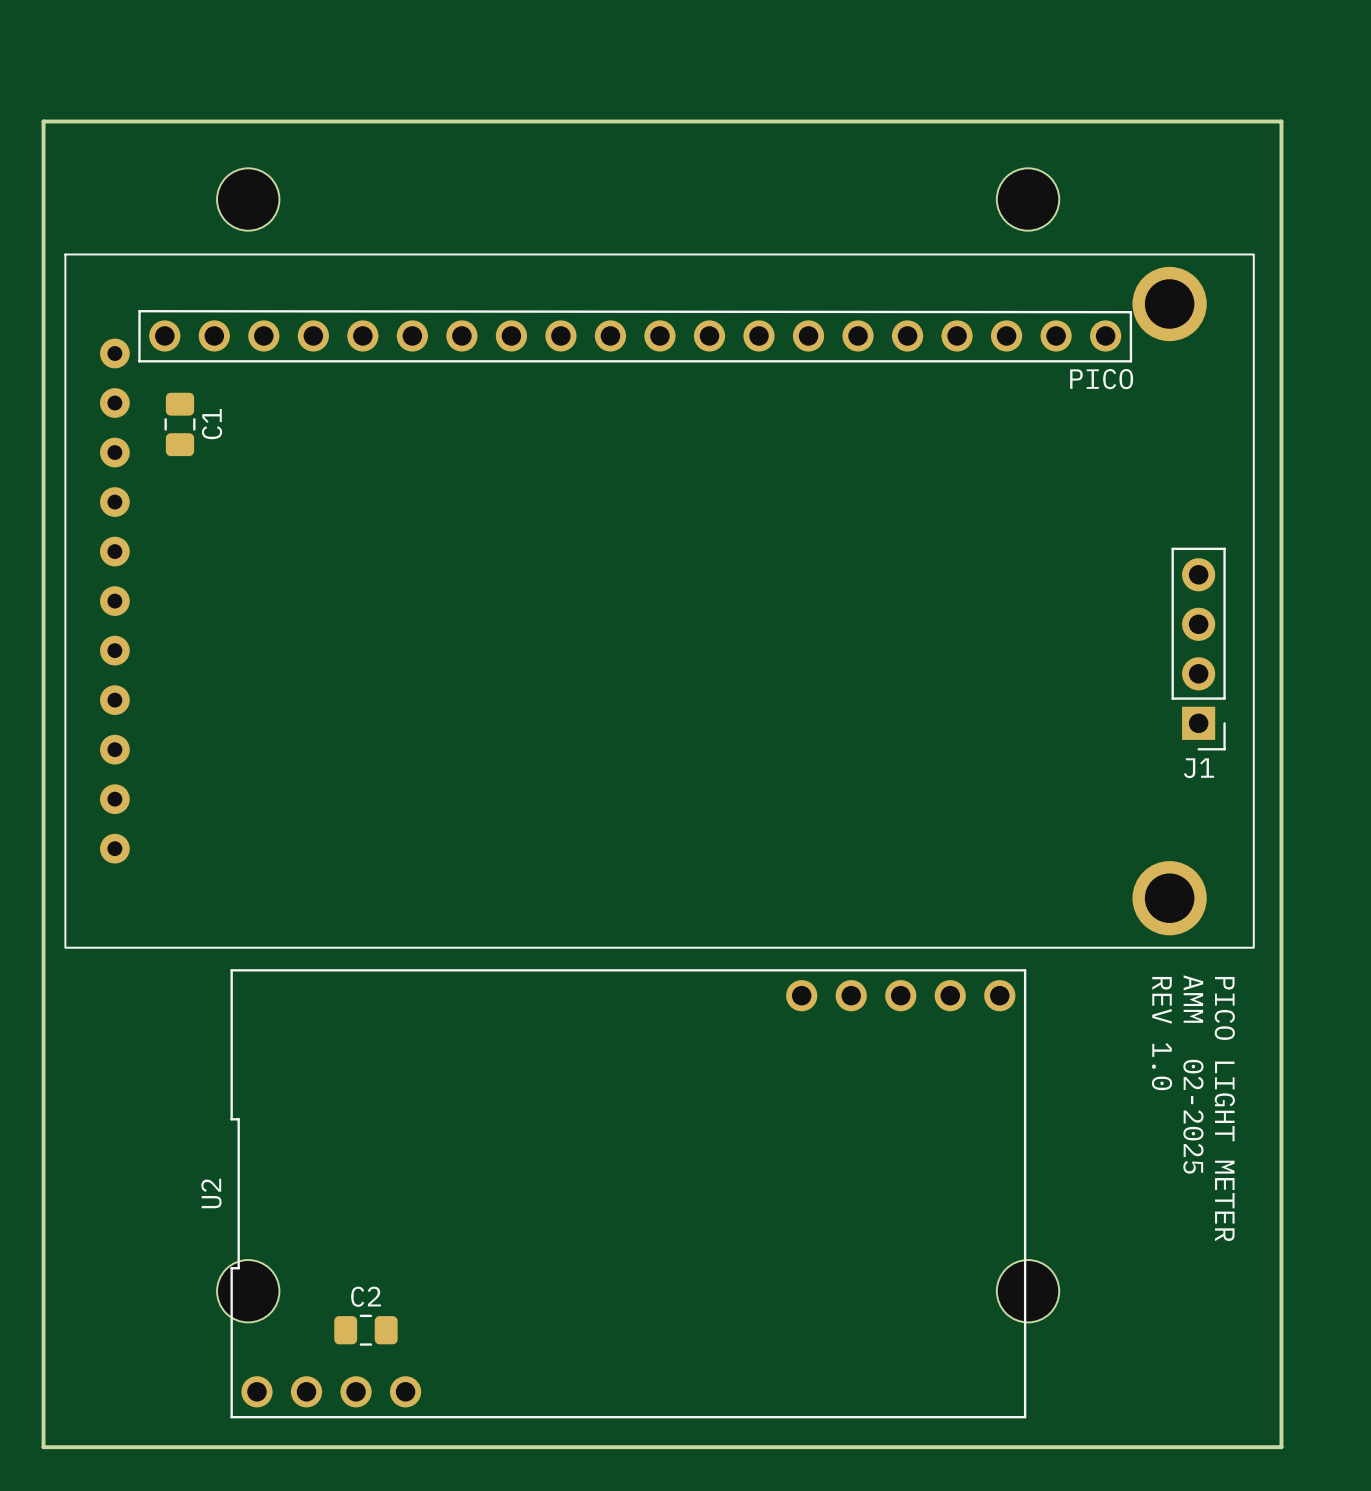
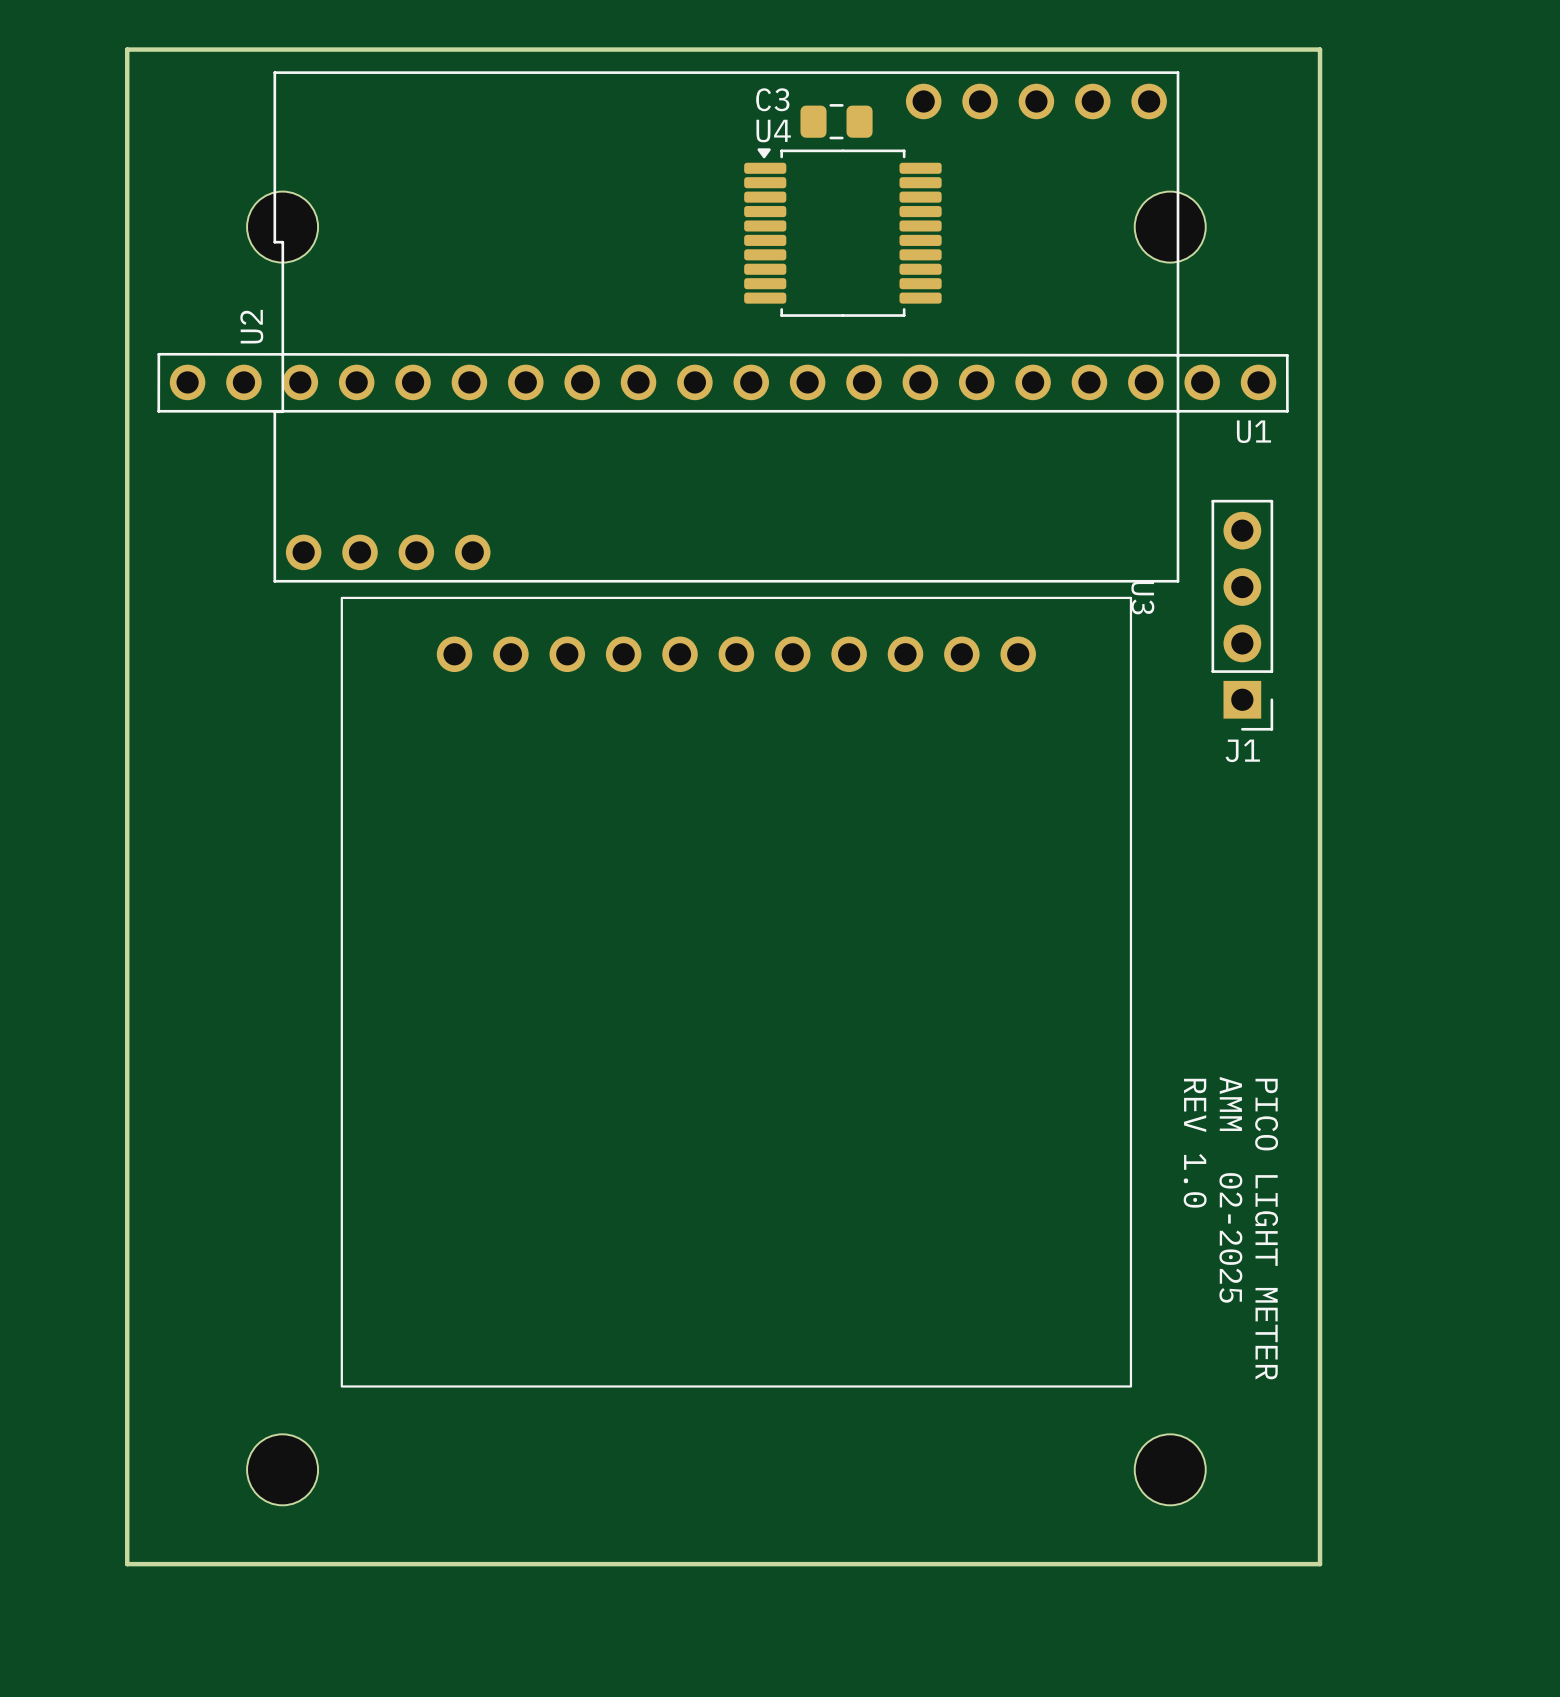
C3: none -> (836, 121)
board edge: (43, 121) (1281, 121) (1281, 1447) (43, 1447) (43, 121) -> (127, 49) (127, 1564) (1320, 1564) (1320, 49) (127, 49)
U4: none -> (842, 232)
PICO name: PICO (1101, 379) -> U1 (1253, 431)
C1: (180, 424) -> none
part: (659, 601) -> none
J1 position: (1198, 649) -> (1242, 615)
U3: none -> (736, 992)
text position: REV 1.0 (1162, 1033) -> REV 1.0 (1195, 1143)
text position: AMM 02-2025 (1193, 1074) -> AMM 02-2025 (1230, 1189)
text position: PICO LIGHT METER (1224, 1109) -> PICO LIGHT METER (1266, 1229)
U2 position: (628, 1193) -> (726, 326)
C2: (365, 1330) -> none

